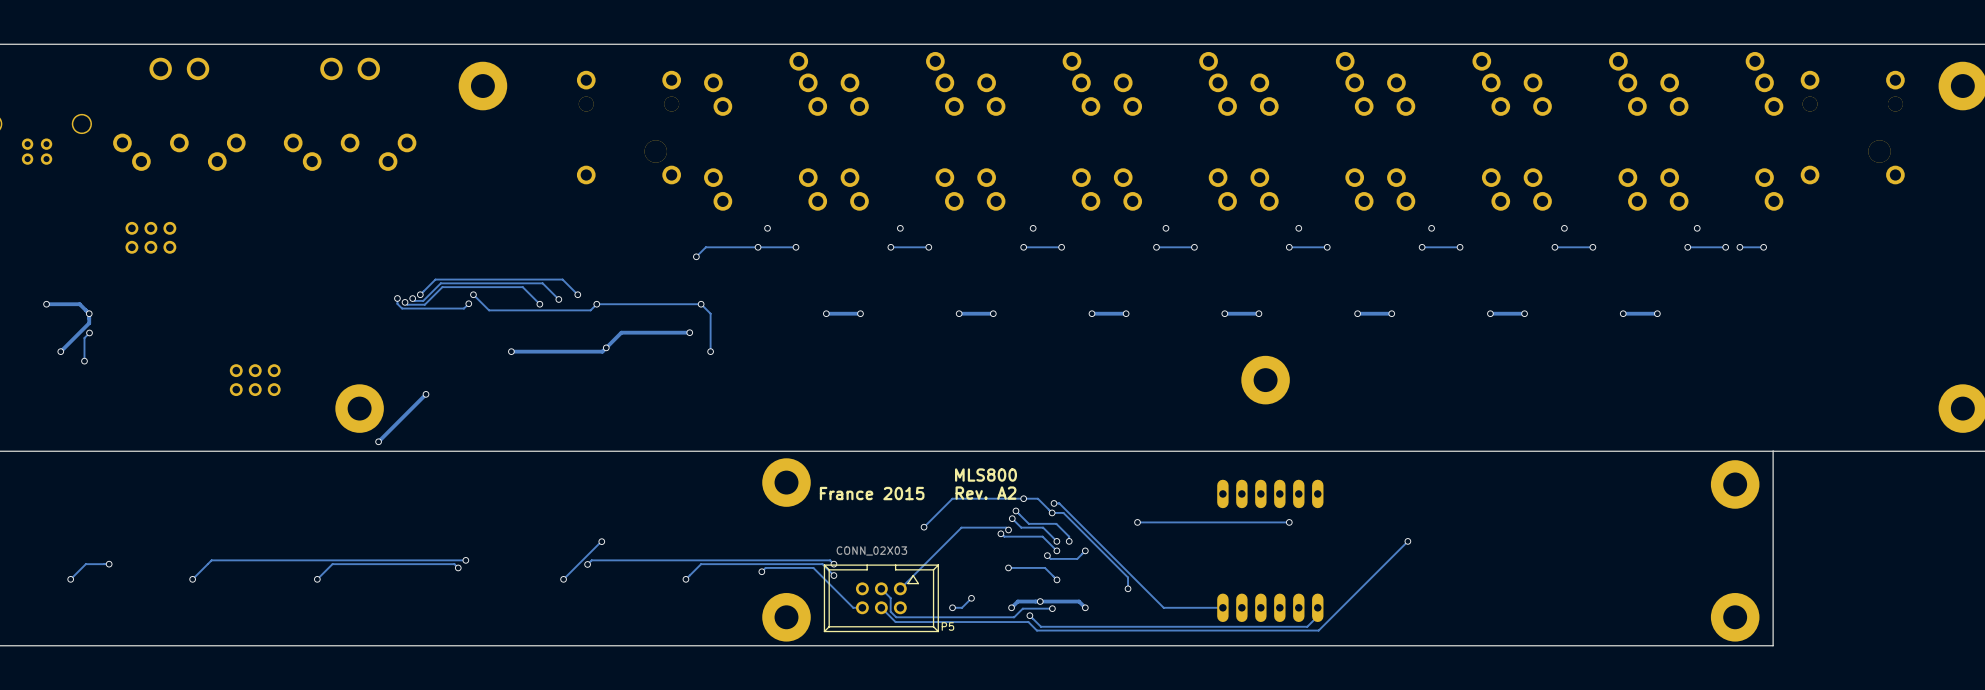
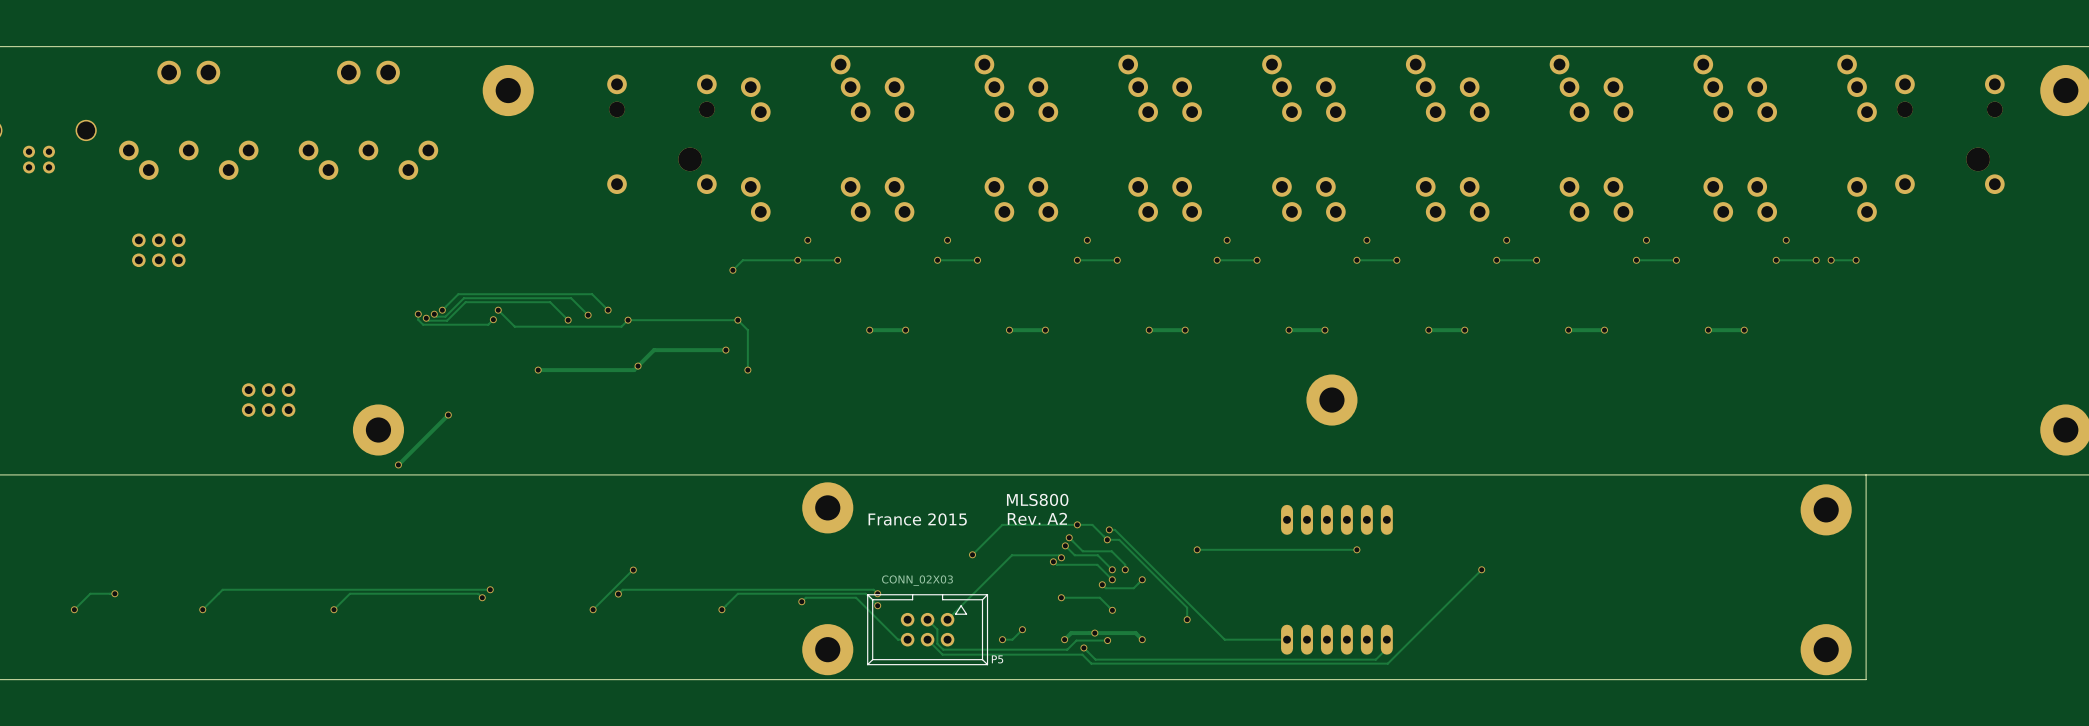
track: (46, 304) (79, 304) (89, 313) (89, 323) (60, 351) -> none
via: (46, 304) -> none
via: (89, 313) -> none
track: (89, 332) (84, 338) (84, 361) -> none
via: (89, 332) -> none
via: (60, 351) -> none
via: (84, 361) -> none

